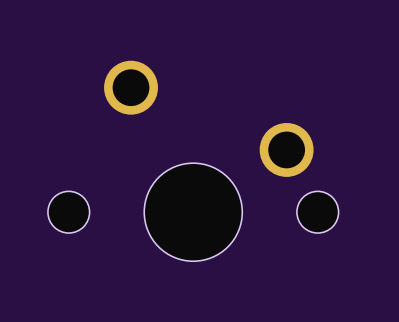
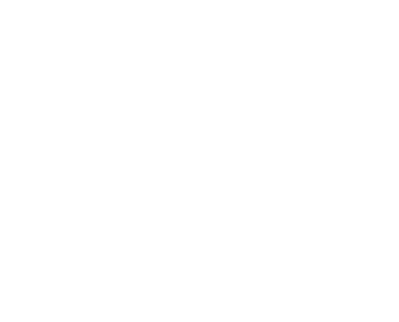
part: (193, 160) -> none

